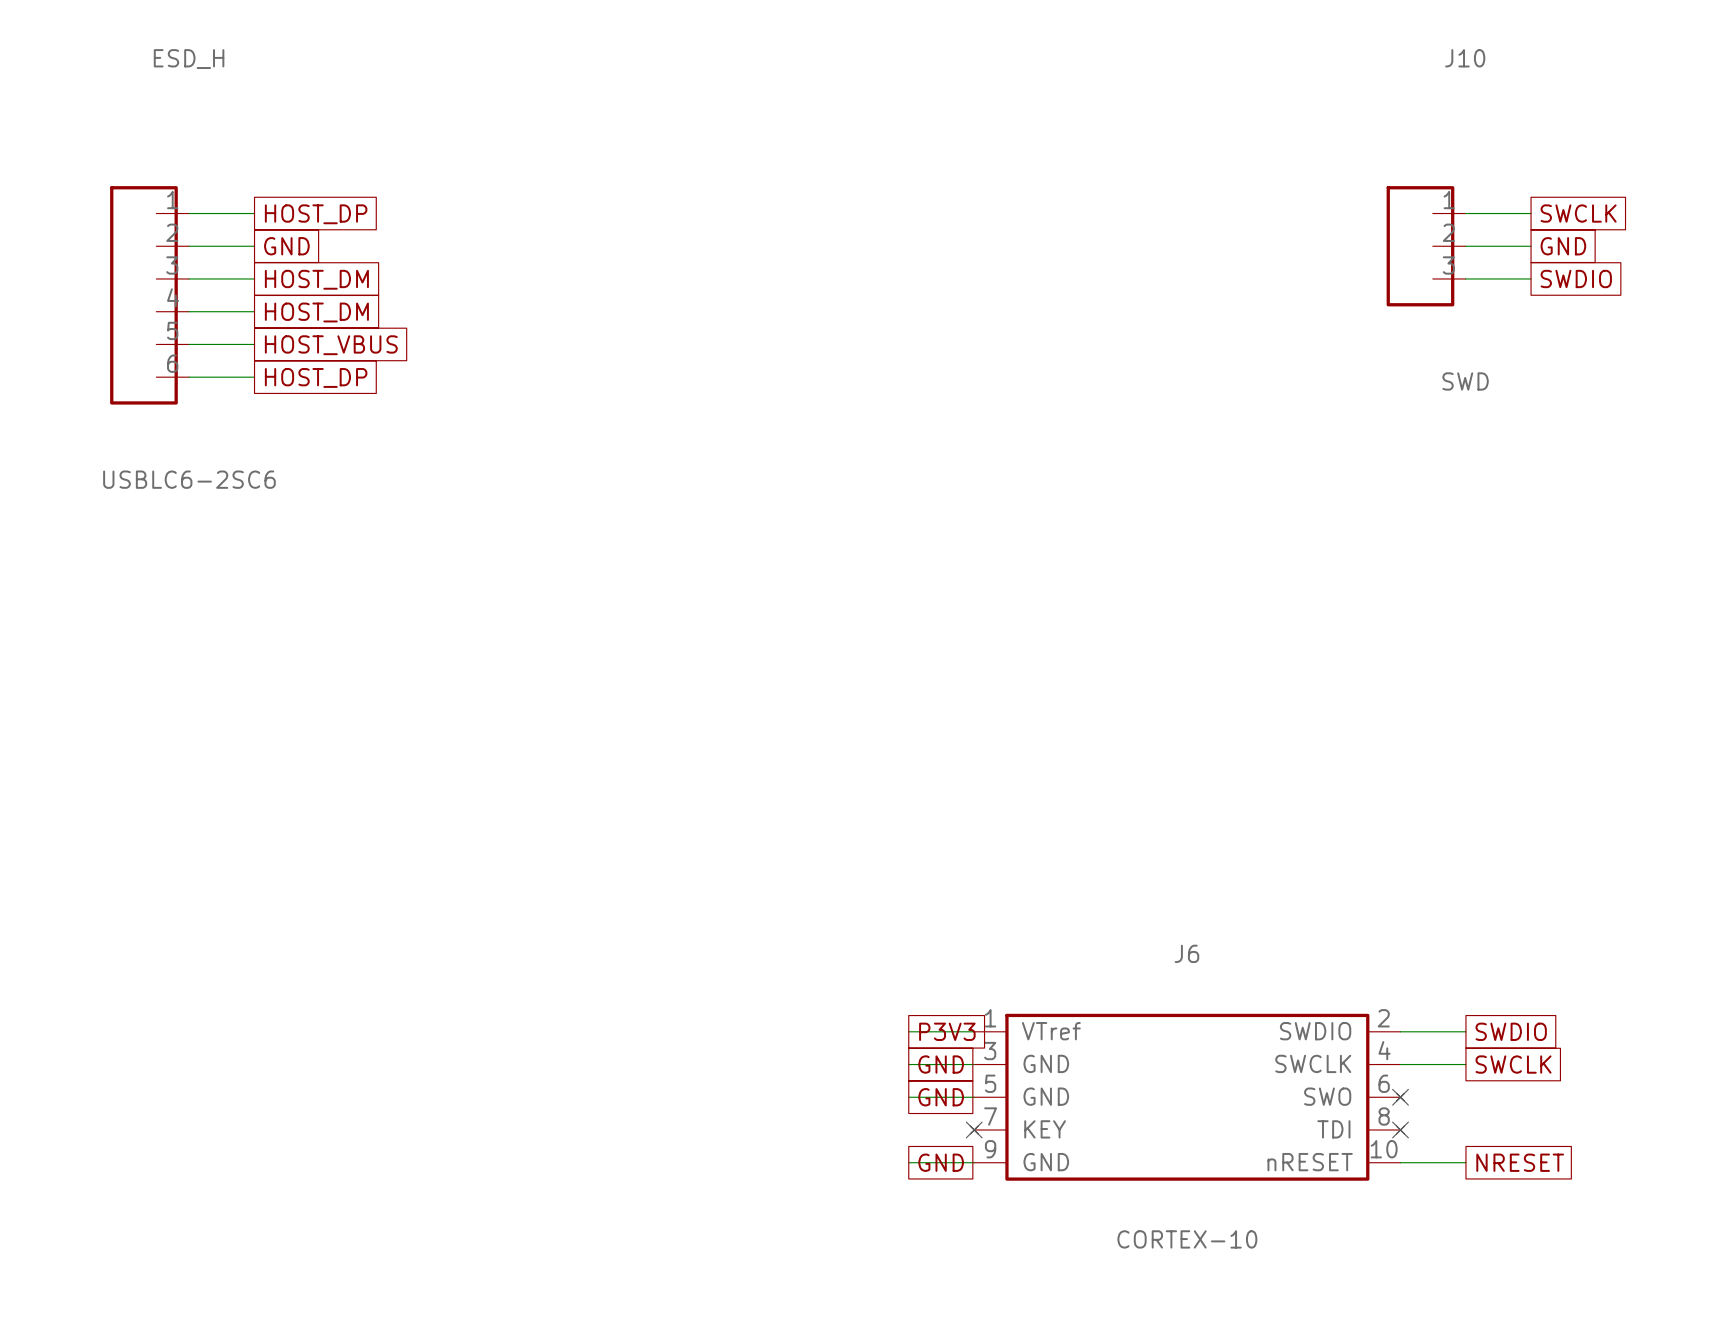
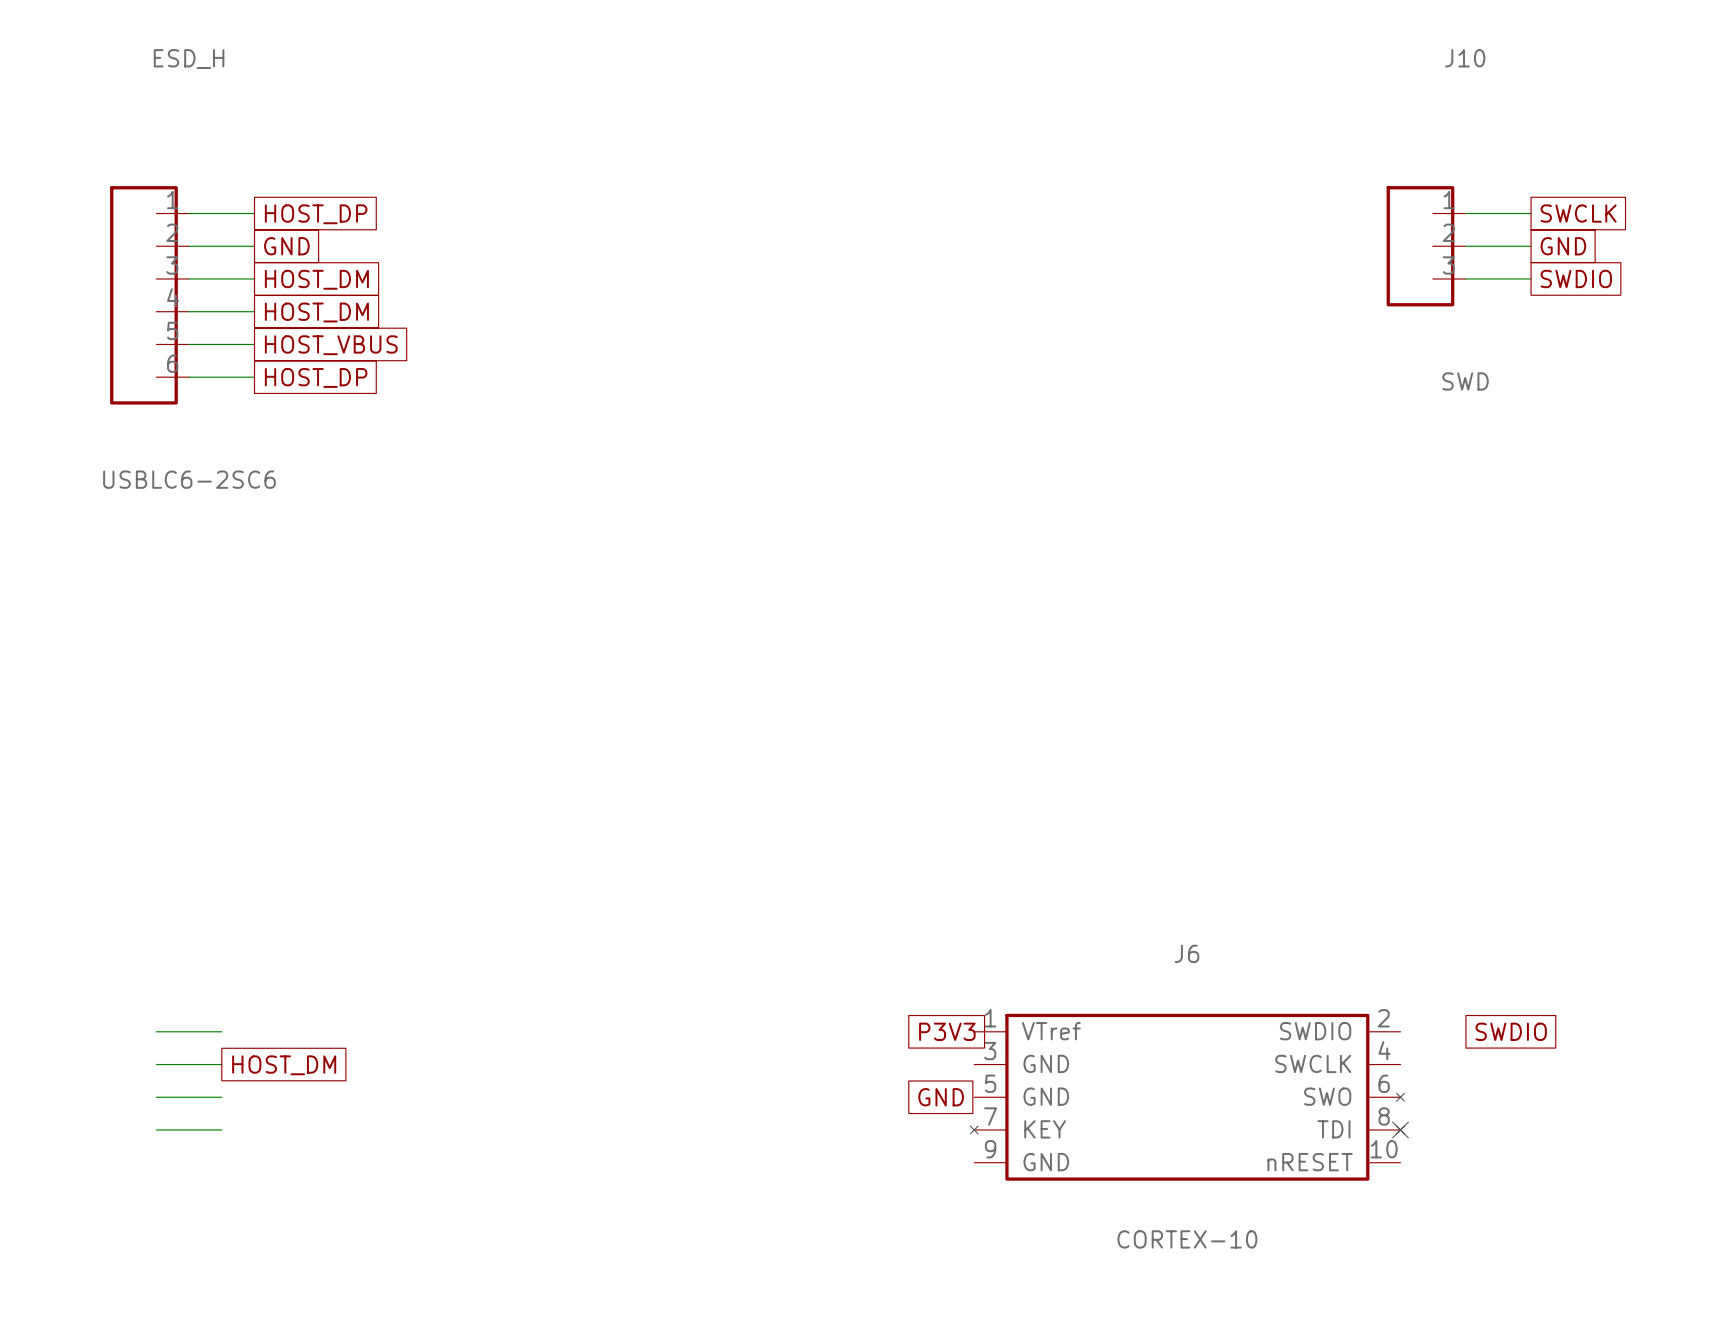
wire: none -> (156, 1031) (221, 1031)
wire: (908, 1031) (974, 1031) -> none
wire: (1400, 1031) (1465, 1031) -> none
wire: none -> (156, 1064) (221, 1064)
wire: (908, 1064) (974, 1064) -> none
global label: GND (941, 1064) -> none
wire: (1400, 1064) (1465, 1064) -> none
global label: SWCLK (1513, 1064) -> none
global label: none -> HOST_DM (284, 1065)
wire: none -> (156, 1097) (221, 1097)
wire: (908, 1097) (974, 1097) -> none
no-connect mark: (1400, 1097) -> none
wire: none -> (156, 1129) (221, 1129)
no-connect mark: (974, 1129) -> none
wire: (908, 1162) (974, 1162) -> none
global label: GND (941, 1162) -> none
wire: (1400, 1162) (1465, 1162) -> none
global label: NRESET (1520, 1162) -> none

